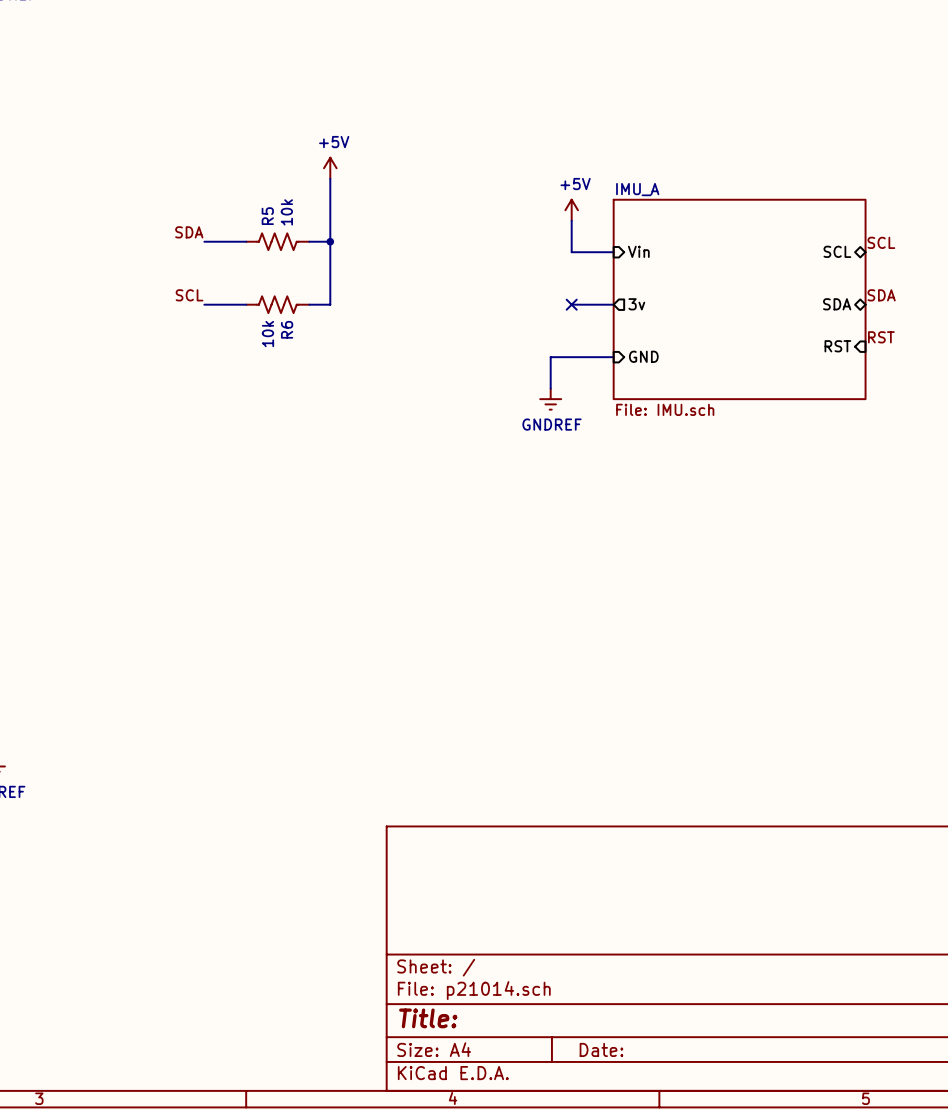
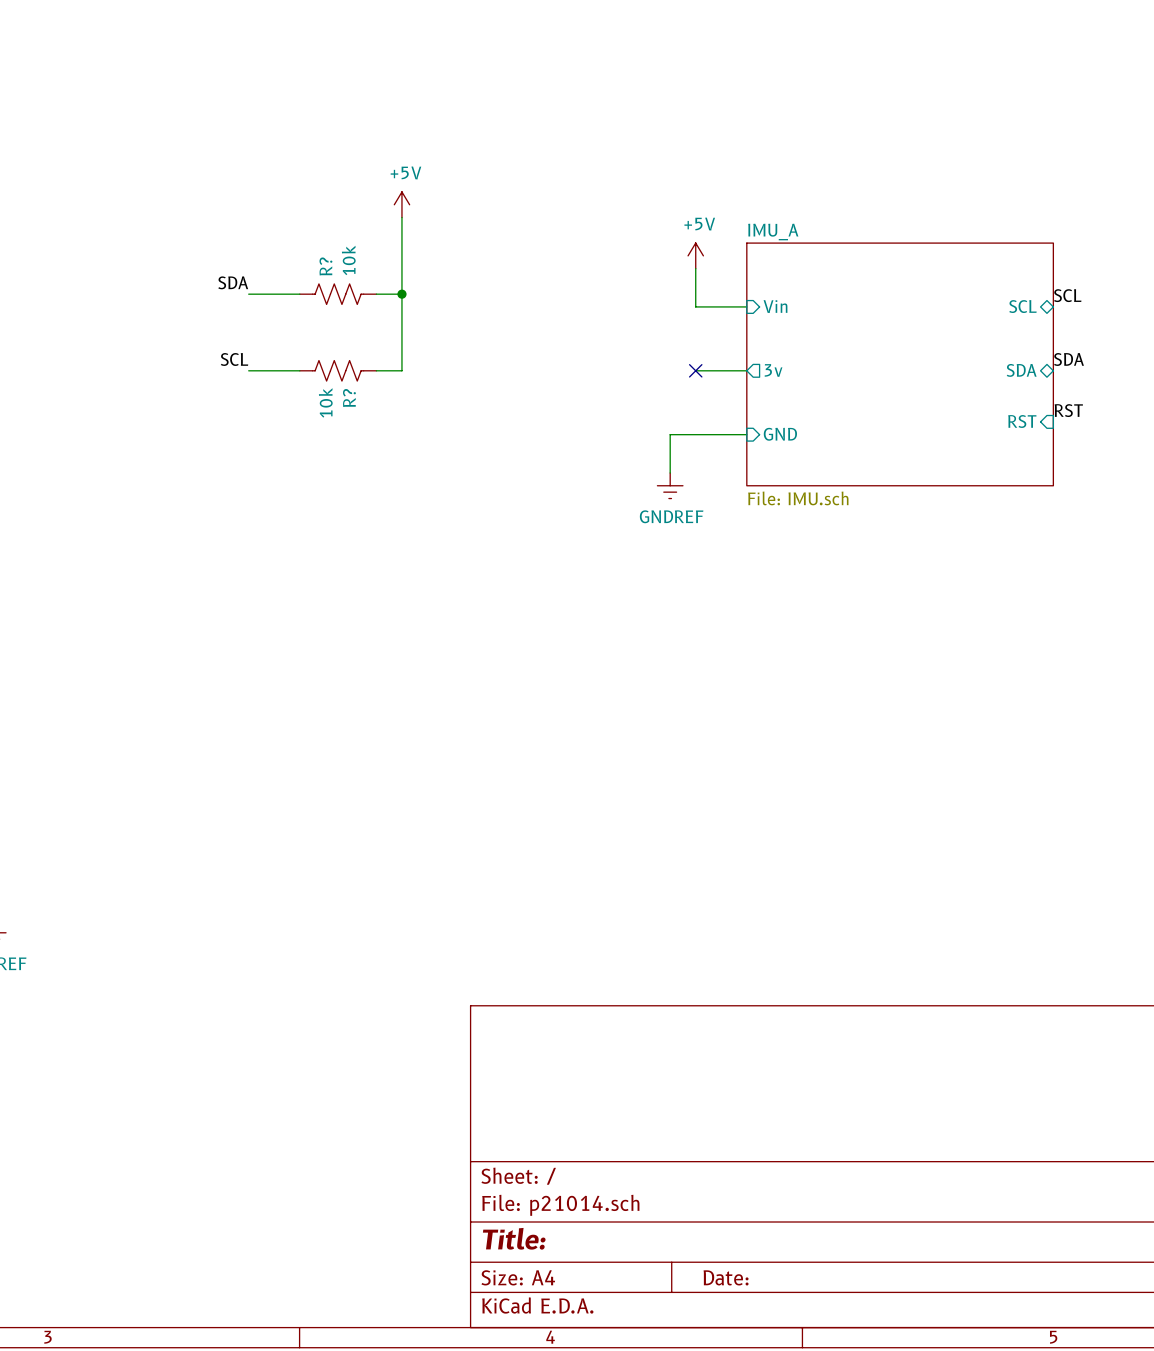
R5 name: R5 (267, 216) -> R? (325, 266)
R6 name: R6 (287, 329) -> R? (349, 398)

